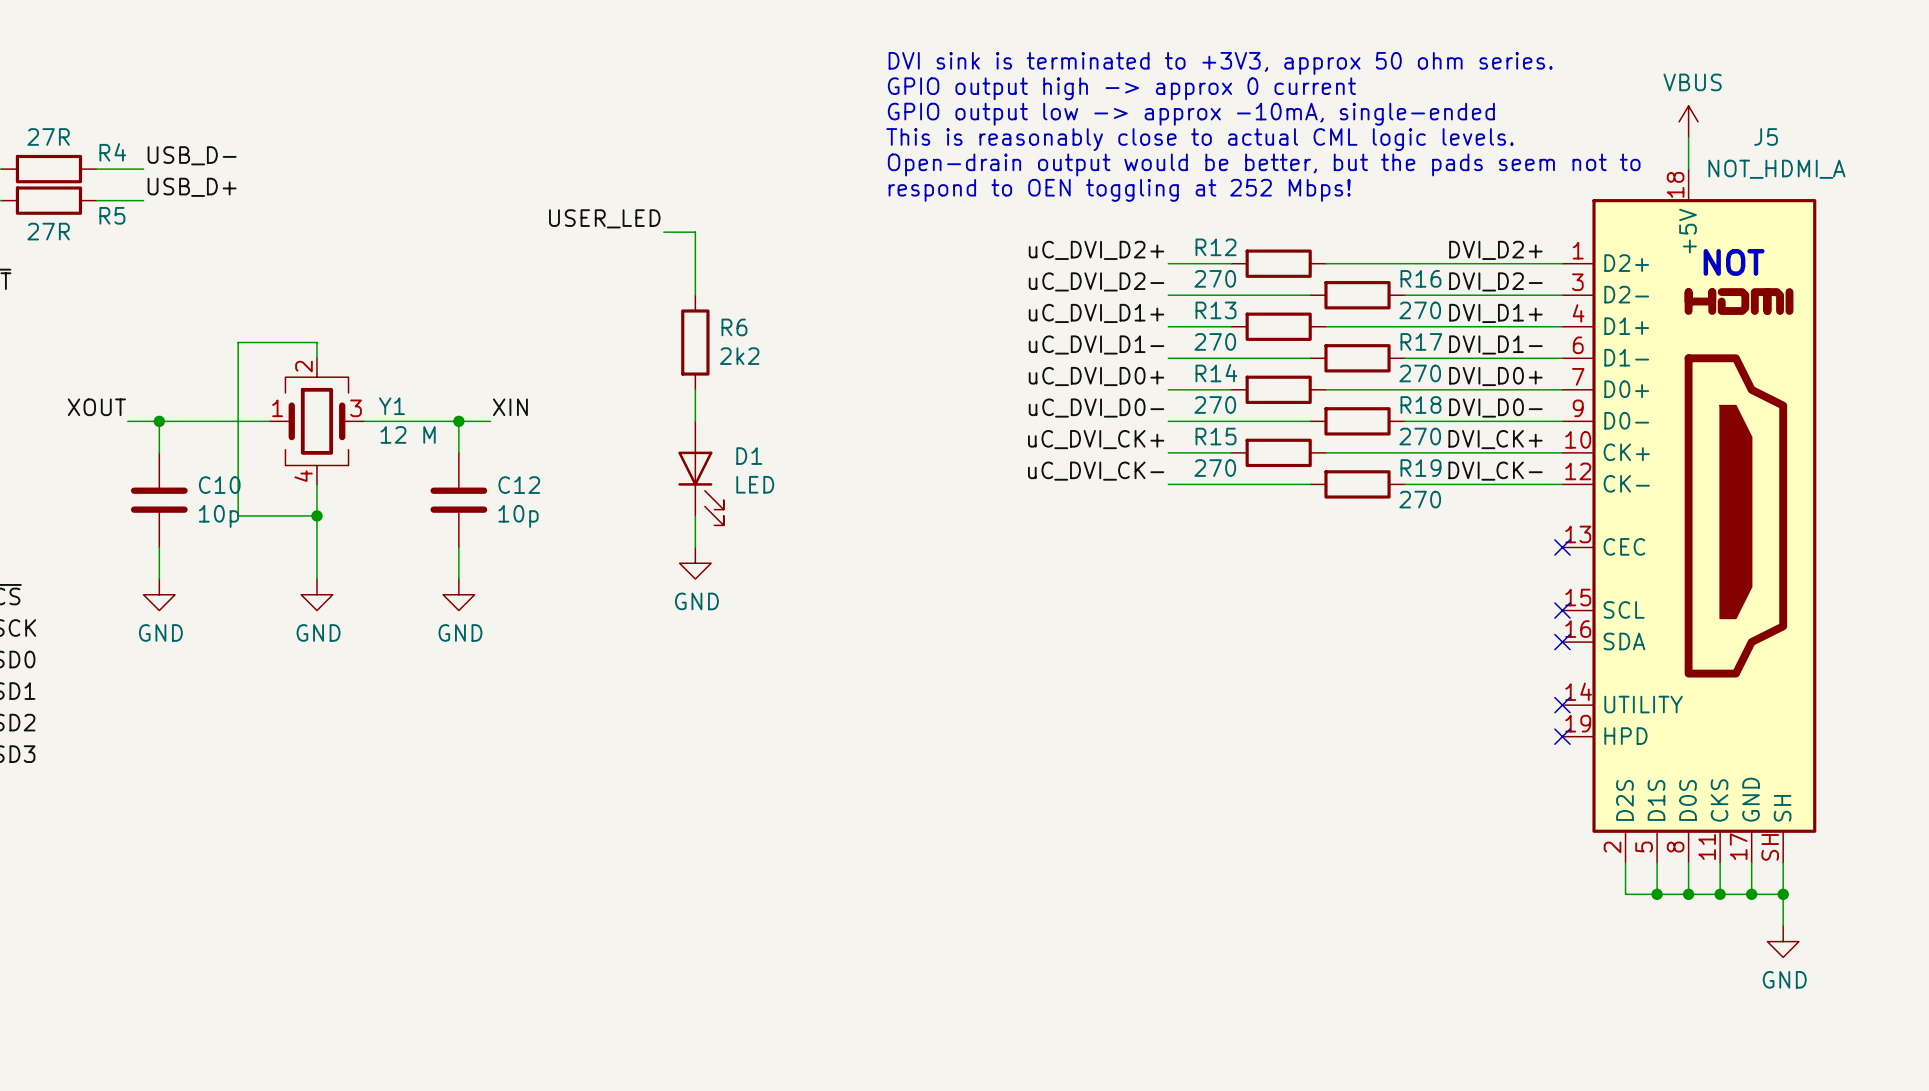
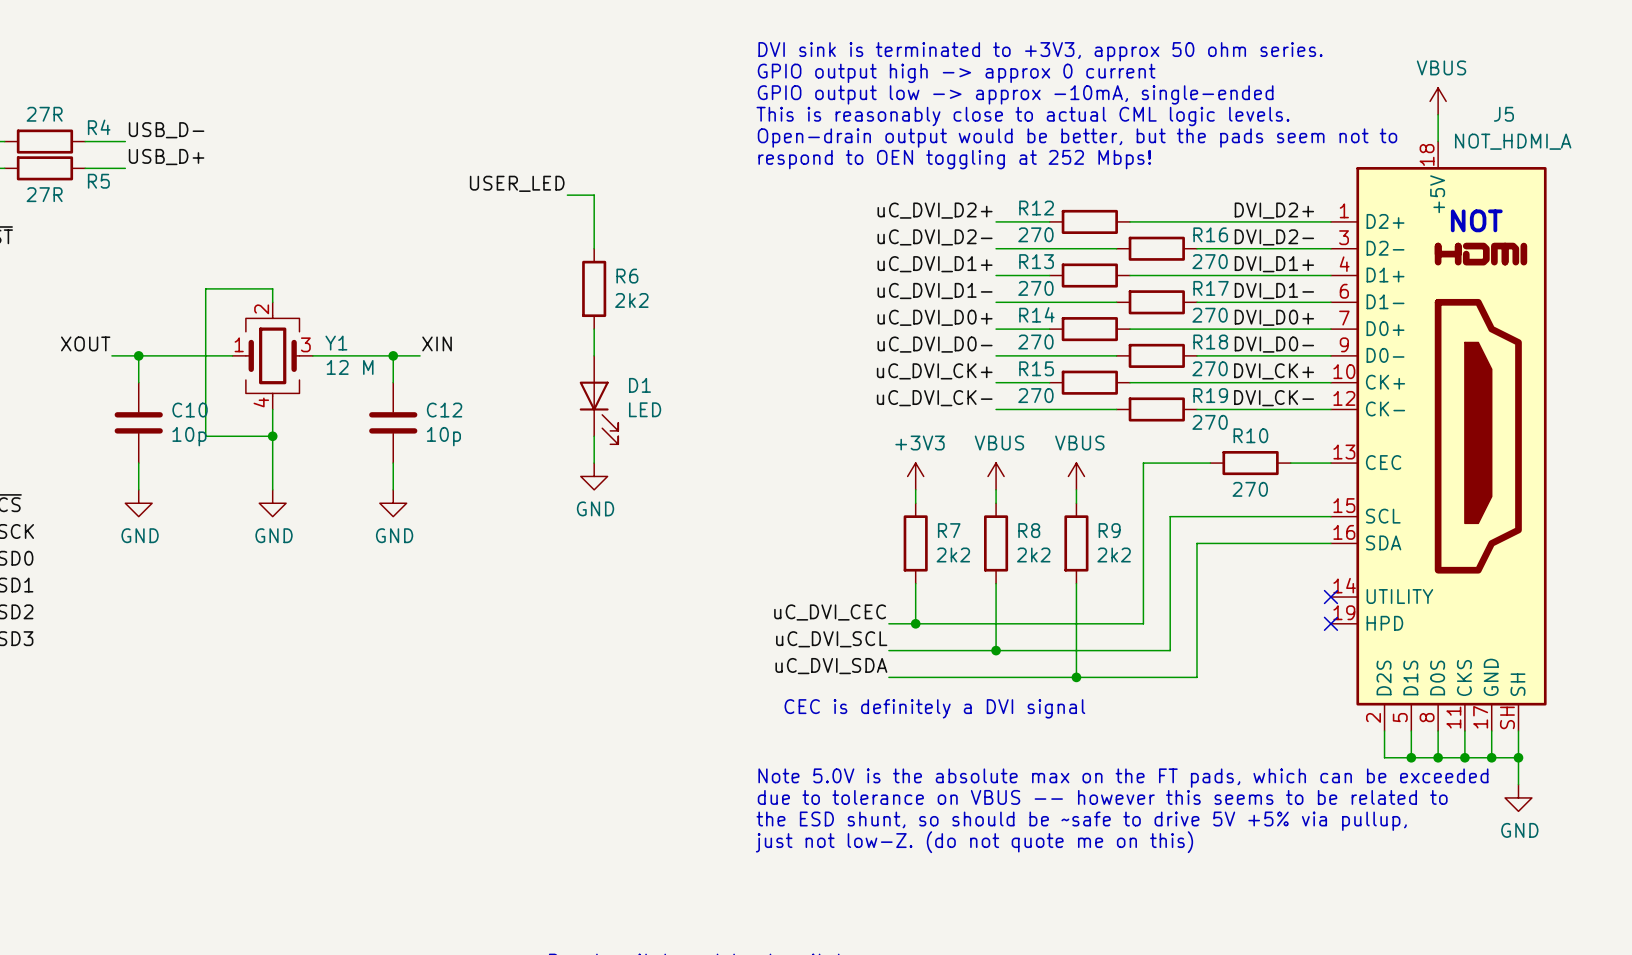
wire: none -> (1210, 463) (1143, 463) (1143, 623) (888, 623)
R10: none -> 270 (1250, 463)
wire: none -> (1290, 463) (1330, 463)
no-connect mark: (1562, 547) -> none
power symbol: none -> +3V3 (915, 476)
power symbol: none -> VBUS (996, 476)
power symbol: none -> VBUS (1076, 476)
wire: none -> (915, 489) (915, 503)
wire: none -> (996, 489) (996, 503)
wire: none -> (1076, 489) (1076, 503)
wire: none -> (1330, 516) (1170, 516) (1170, 650) (888, 650)
no-connect mark: (1562, 610) -> none
R7: none -> 2k2 (915, 543)
R8: none -> 2k2 (996, 543)
R9: none -> 2k2 (1076, 543)
wire: none -> (1330, 543) (1196, 543) (1196, 677) (888, 677)
no-connect mark: (1562, 642) -> none
wire: none -> (915, 583) (915, 623)
wire: none -> (996, 583) (996, 650)
wire: none -> (1076, 583) (1076, 677)
label: none -> uC_DVI_CEC (830, 612)
junction: none -> (915, 623)
label: none -> uC_DVI_SCL (831, 639)
junction: none -> (996, 650)
label: none -> uC_DVI_SDA (831, 666)
junction: none -> (1076, 677)
text: none -> CEC is definitely a DVI signal (934, 708)
text: none -> Note 5.0V is the absolute max on the FT pads, which can be exceeded (1123, 778)
text: none -> due to tolerance on VBUS -- however this seems to be related to (1102, 797)
text: none -> the ESD shunt, so should be ~safe to drive 5V +5% via pullup, (1081, 821)
text: none -> just not low-Z. (do not quote me on this) (974, 842)

